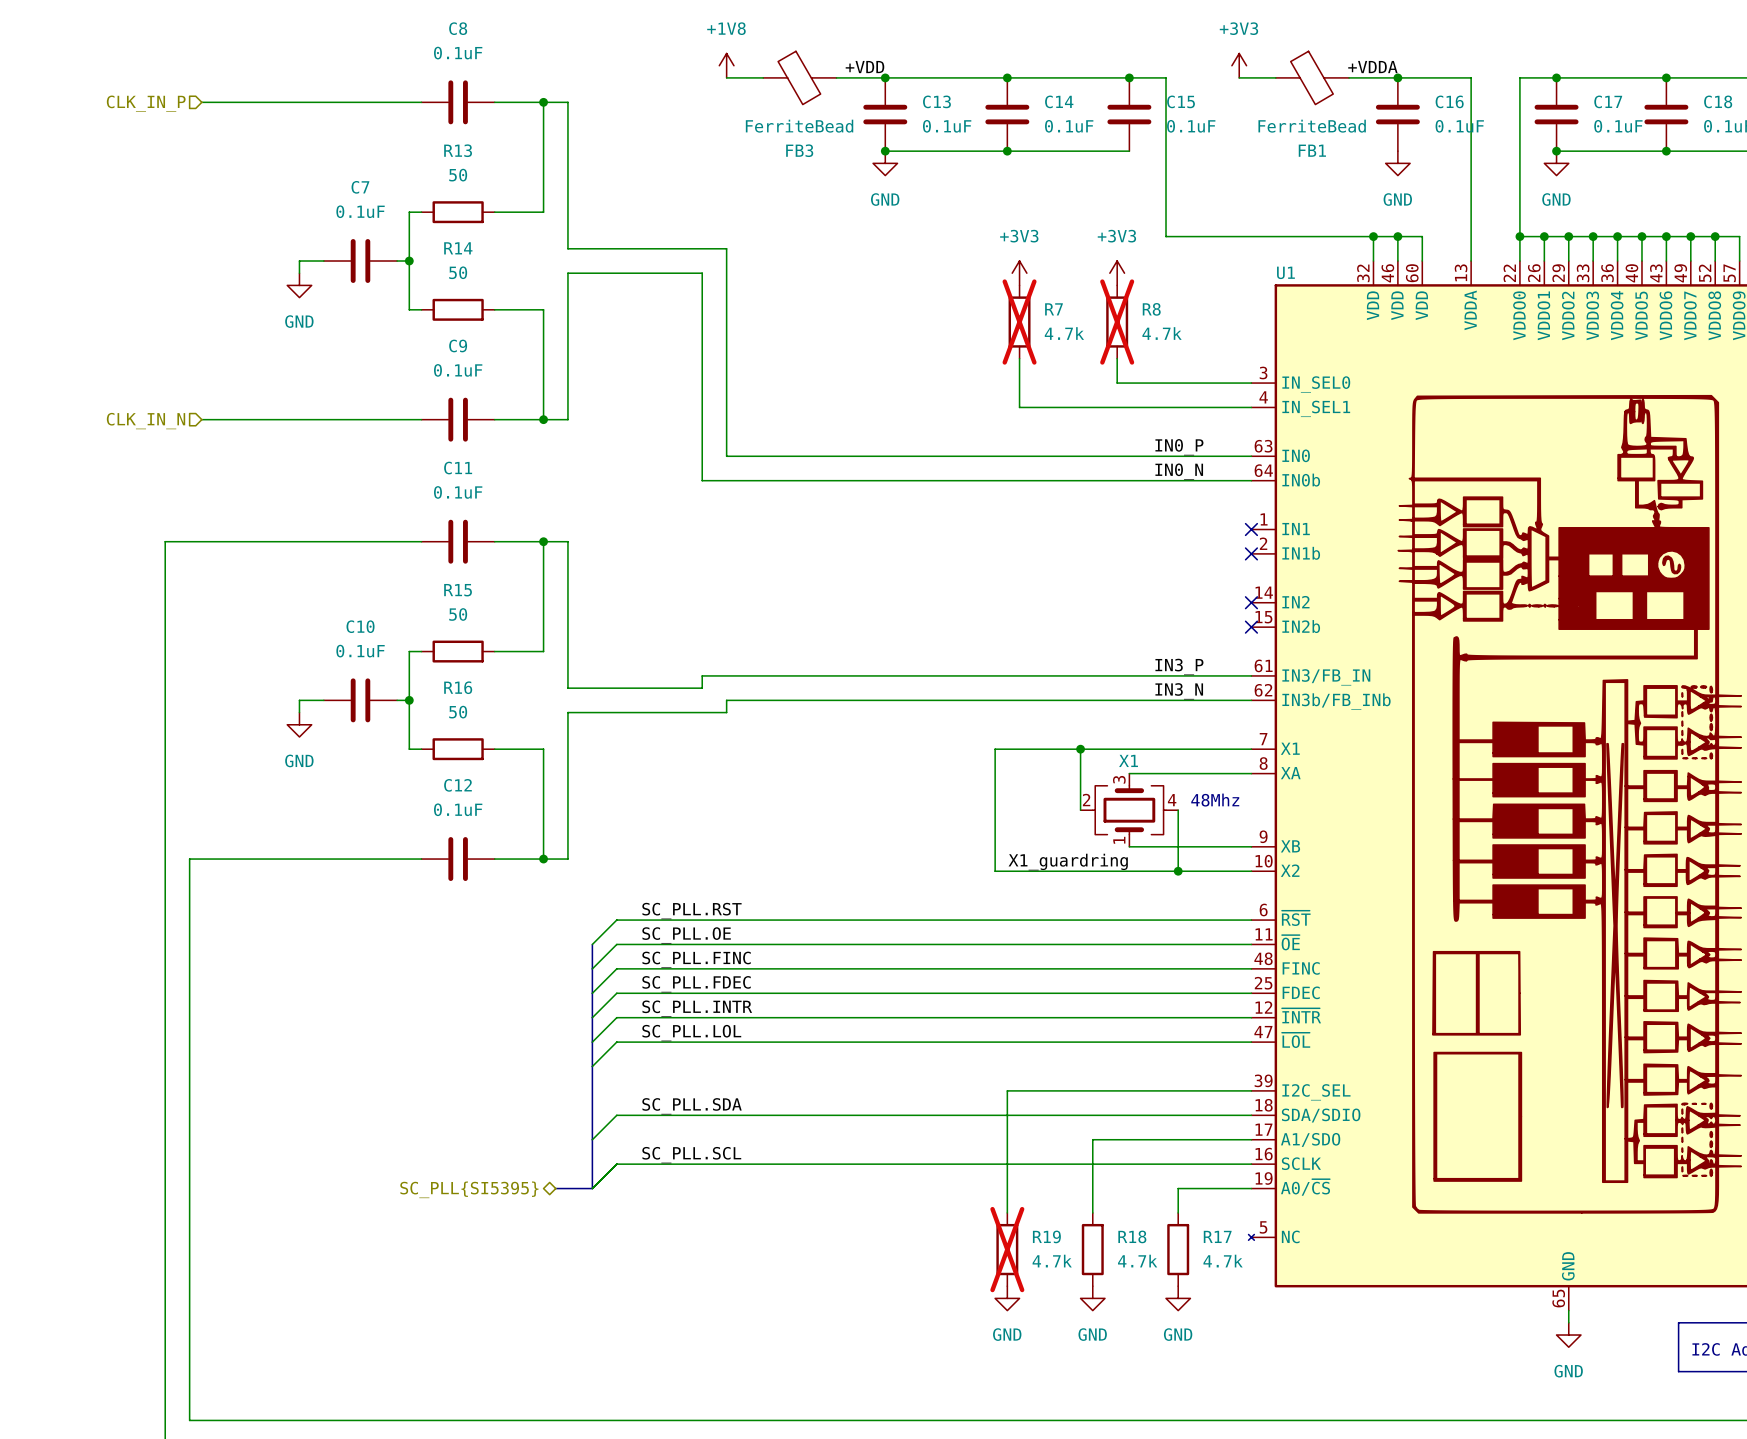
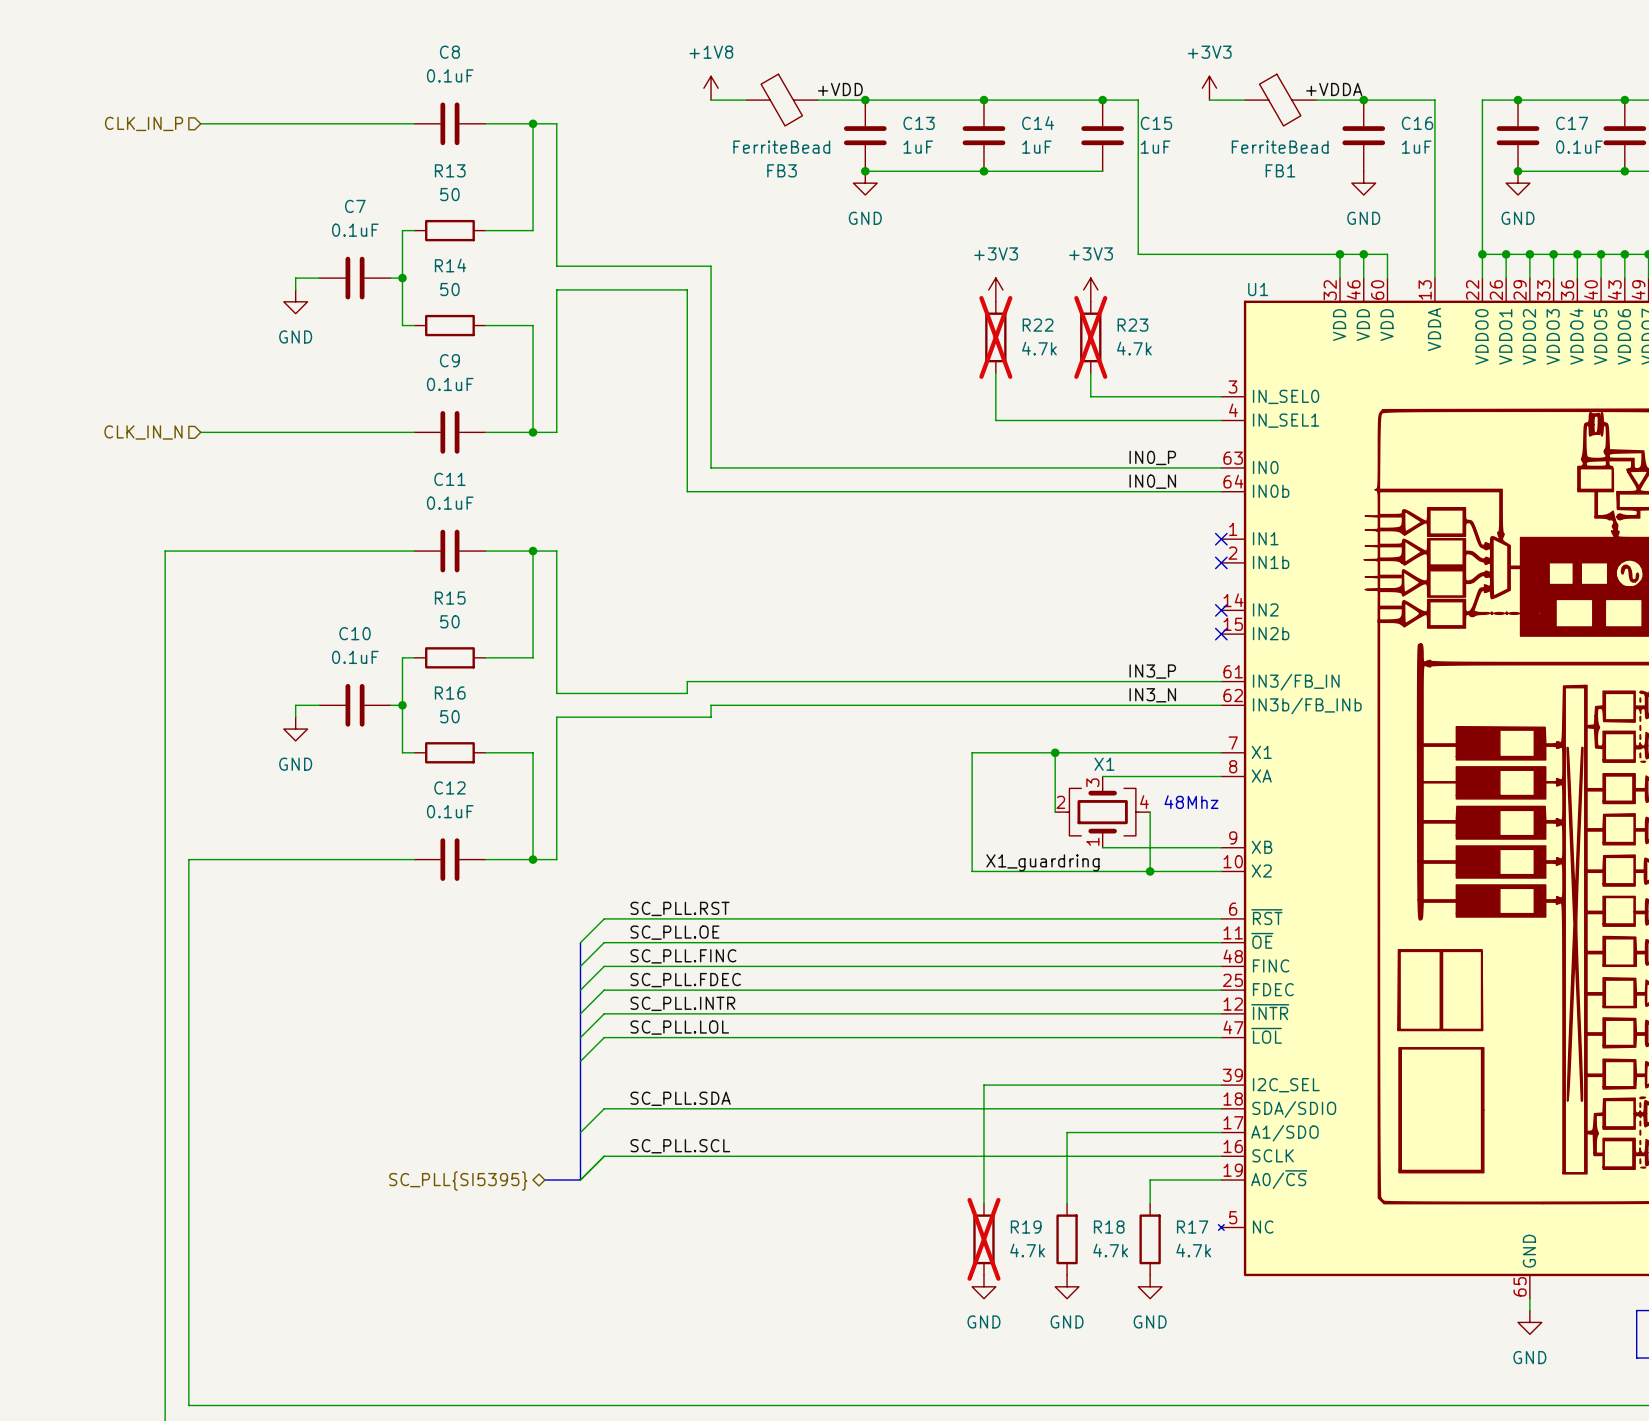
C13 value: 0.1uF (947, 126) -> 1uF (918, 147)
C14 value: 0.1uF (1069, 126) -> 1uF (1036, 147)
C15 value: 0.1uF (1191, 126) -> 1uF (1155, 147)
C16 value: 0.1uF (1459, 126) -> 1uF (1416, 147)
R7 name: R7 (1053, 309) -> R22 (1038, 325)
R8 name: R8 (1151, 309) -> R23 (1132, 325)

